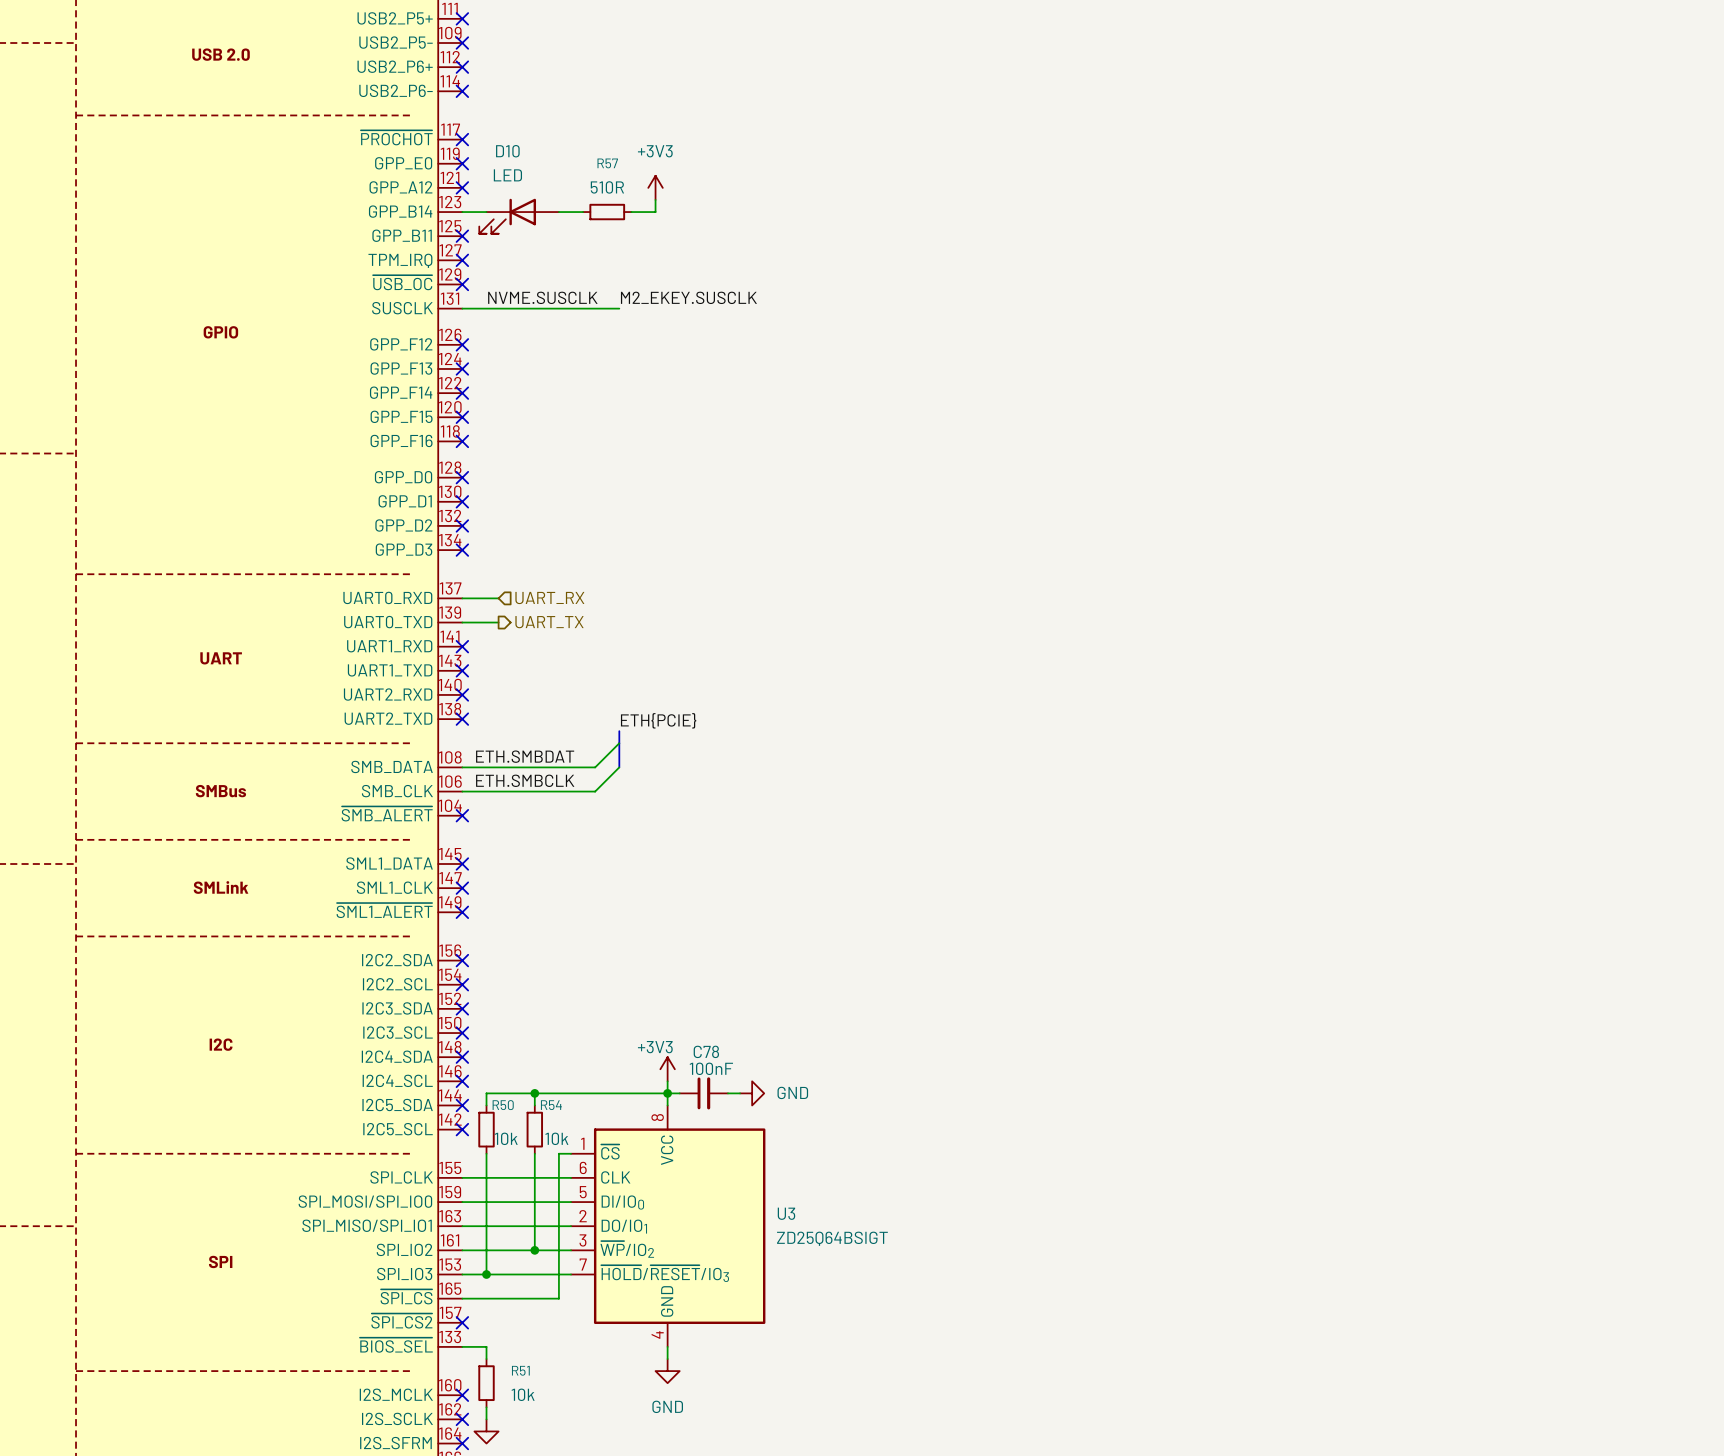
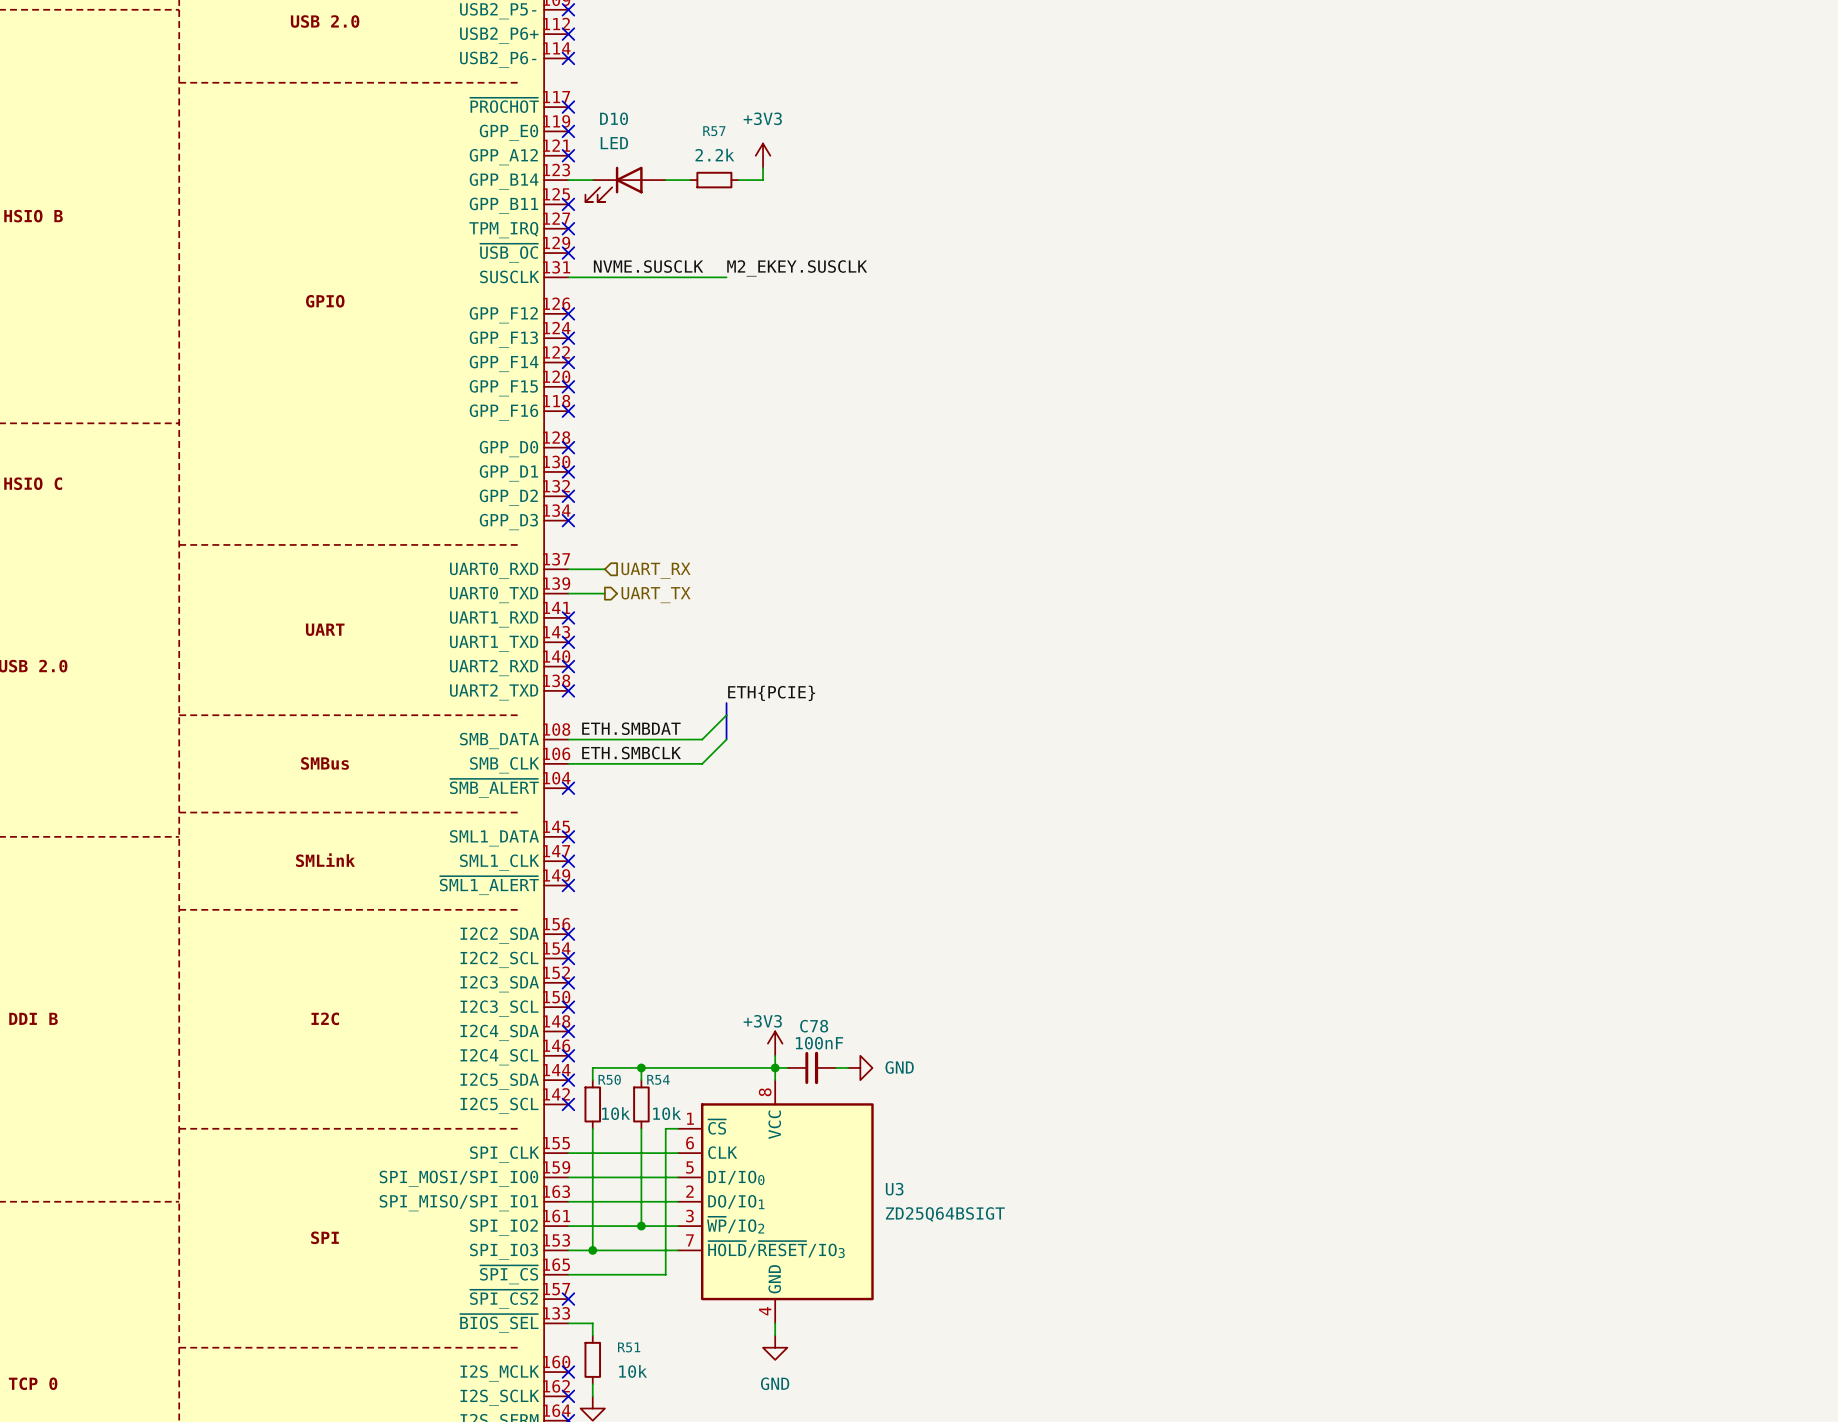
R57 value: 510R (607, 187) -> 2.2k (714, 155)

